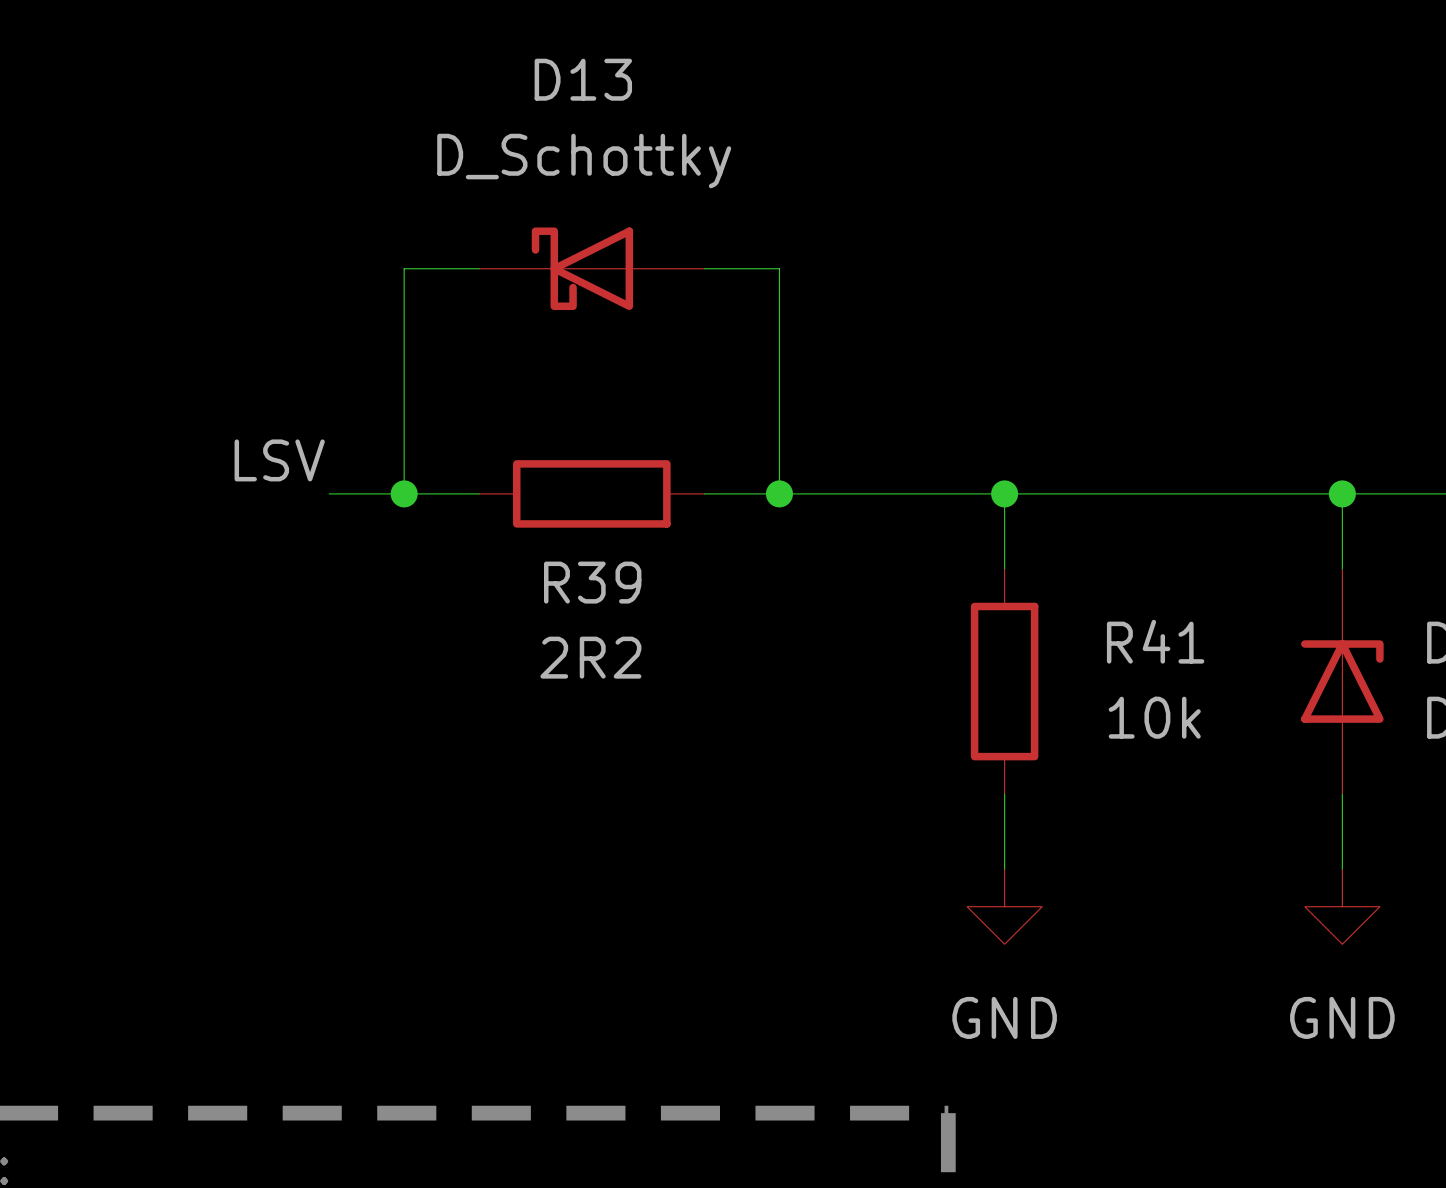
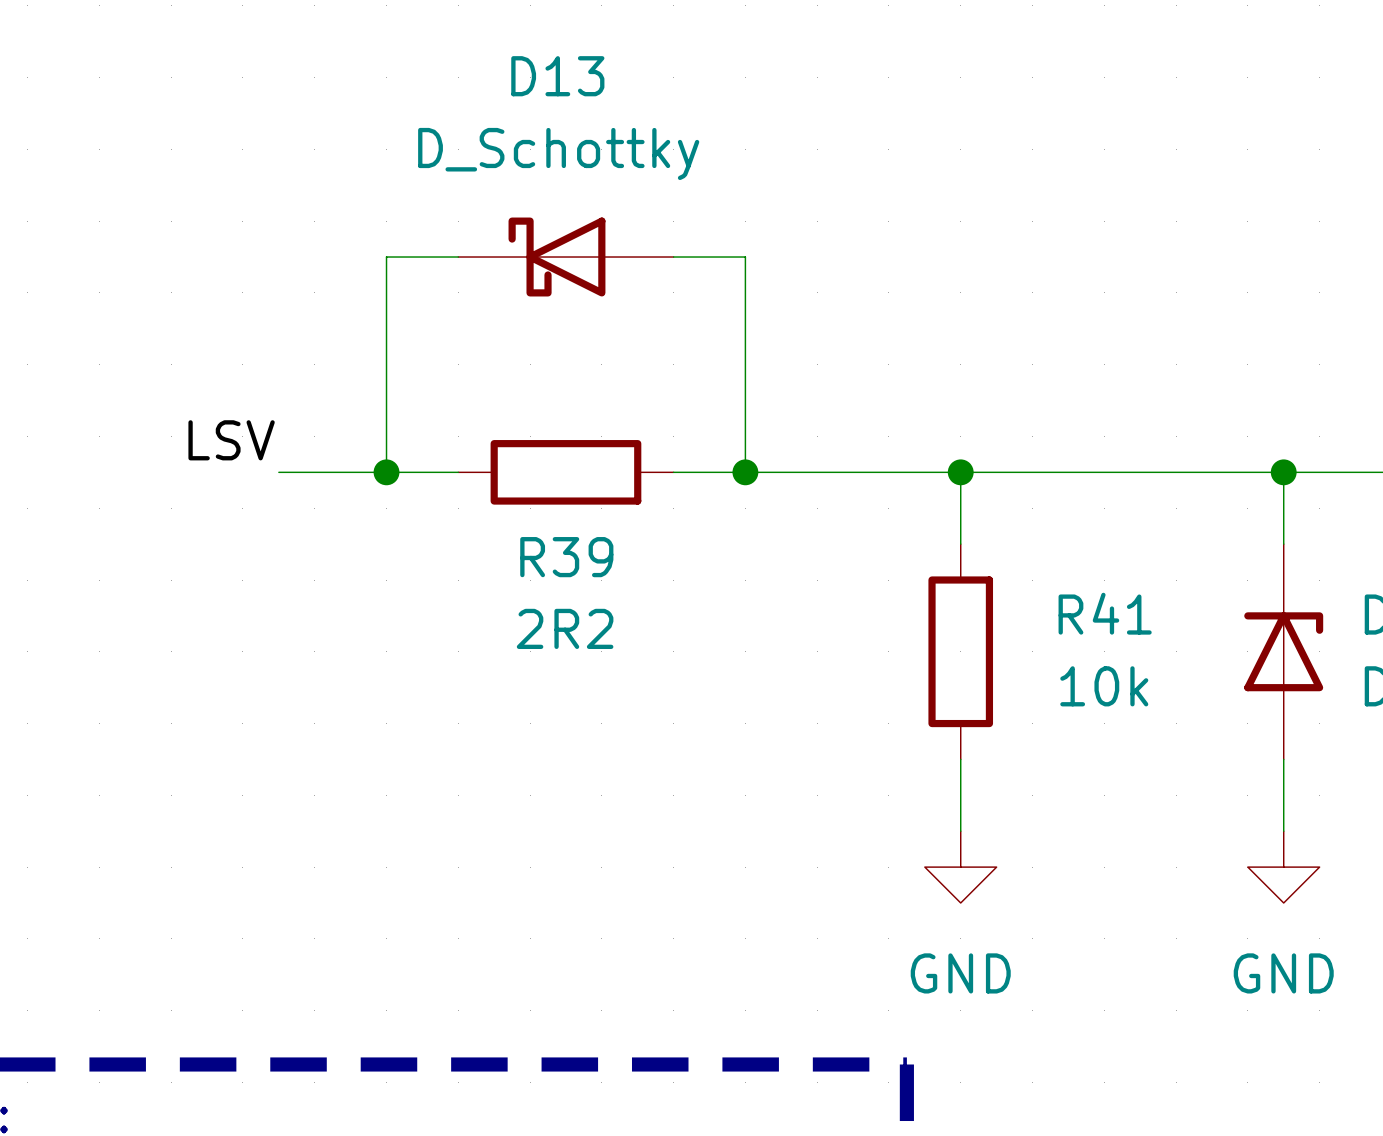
label position: LSV (279, 460) -> LSV (231, 440)
wire: none -> (278, 472) (314, 472)

